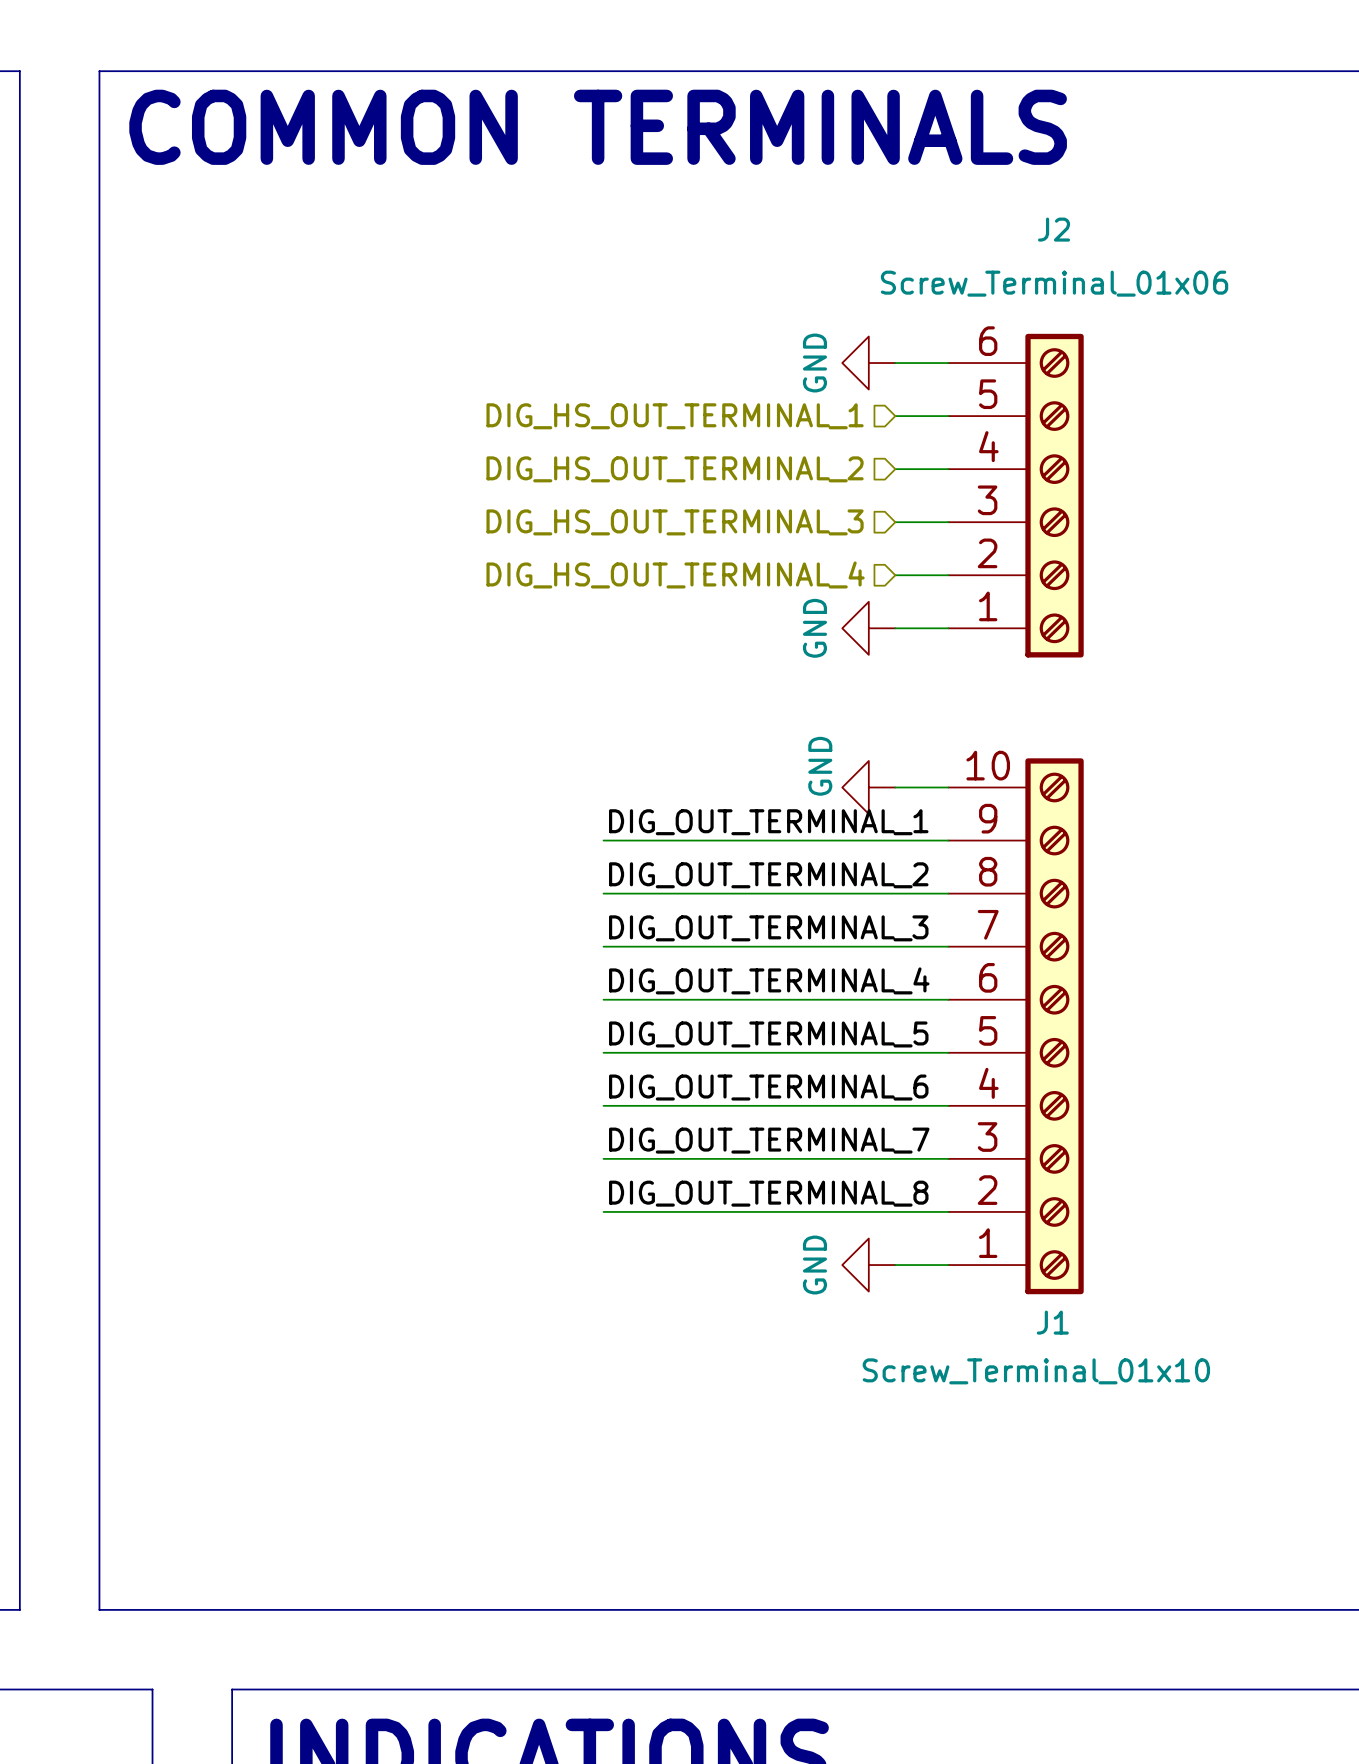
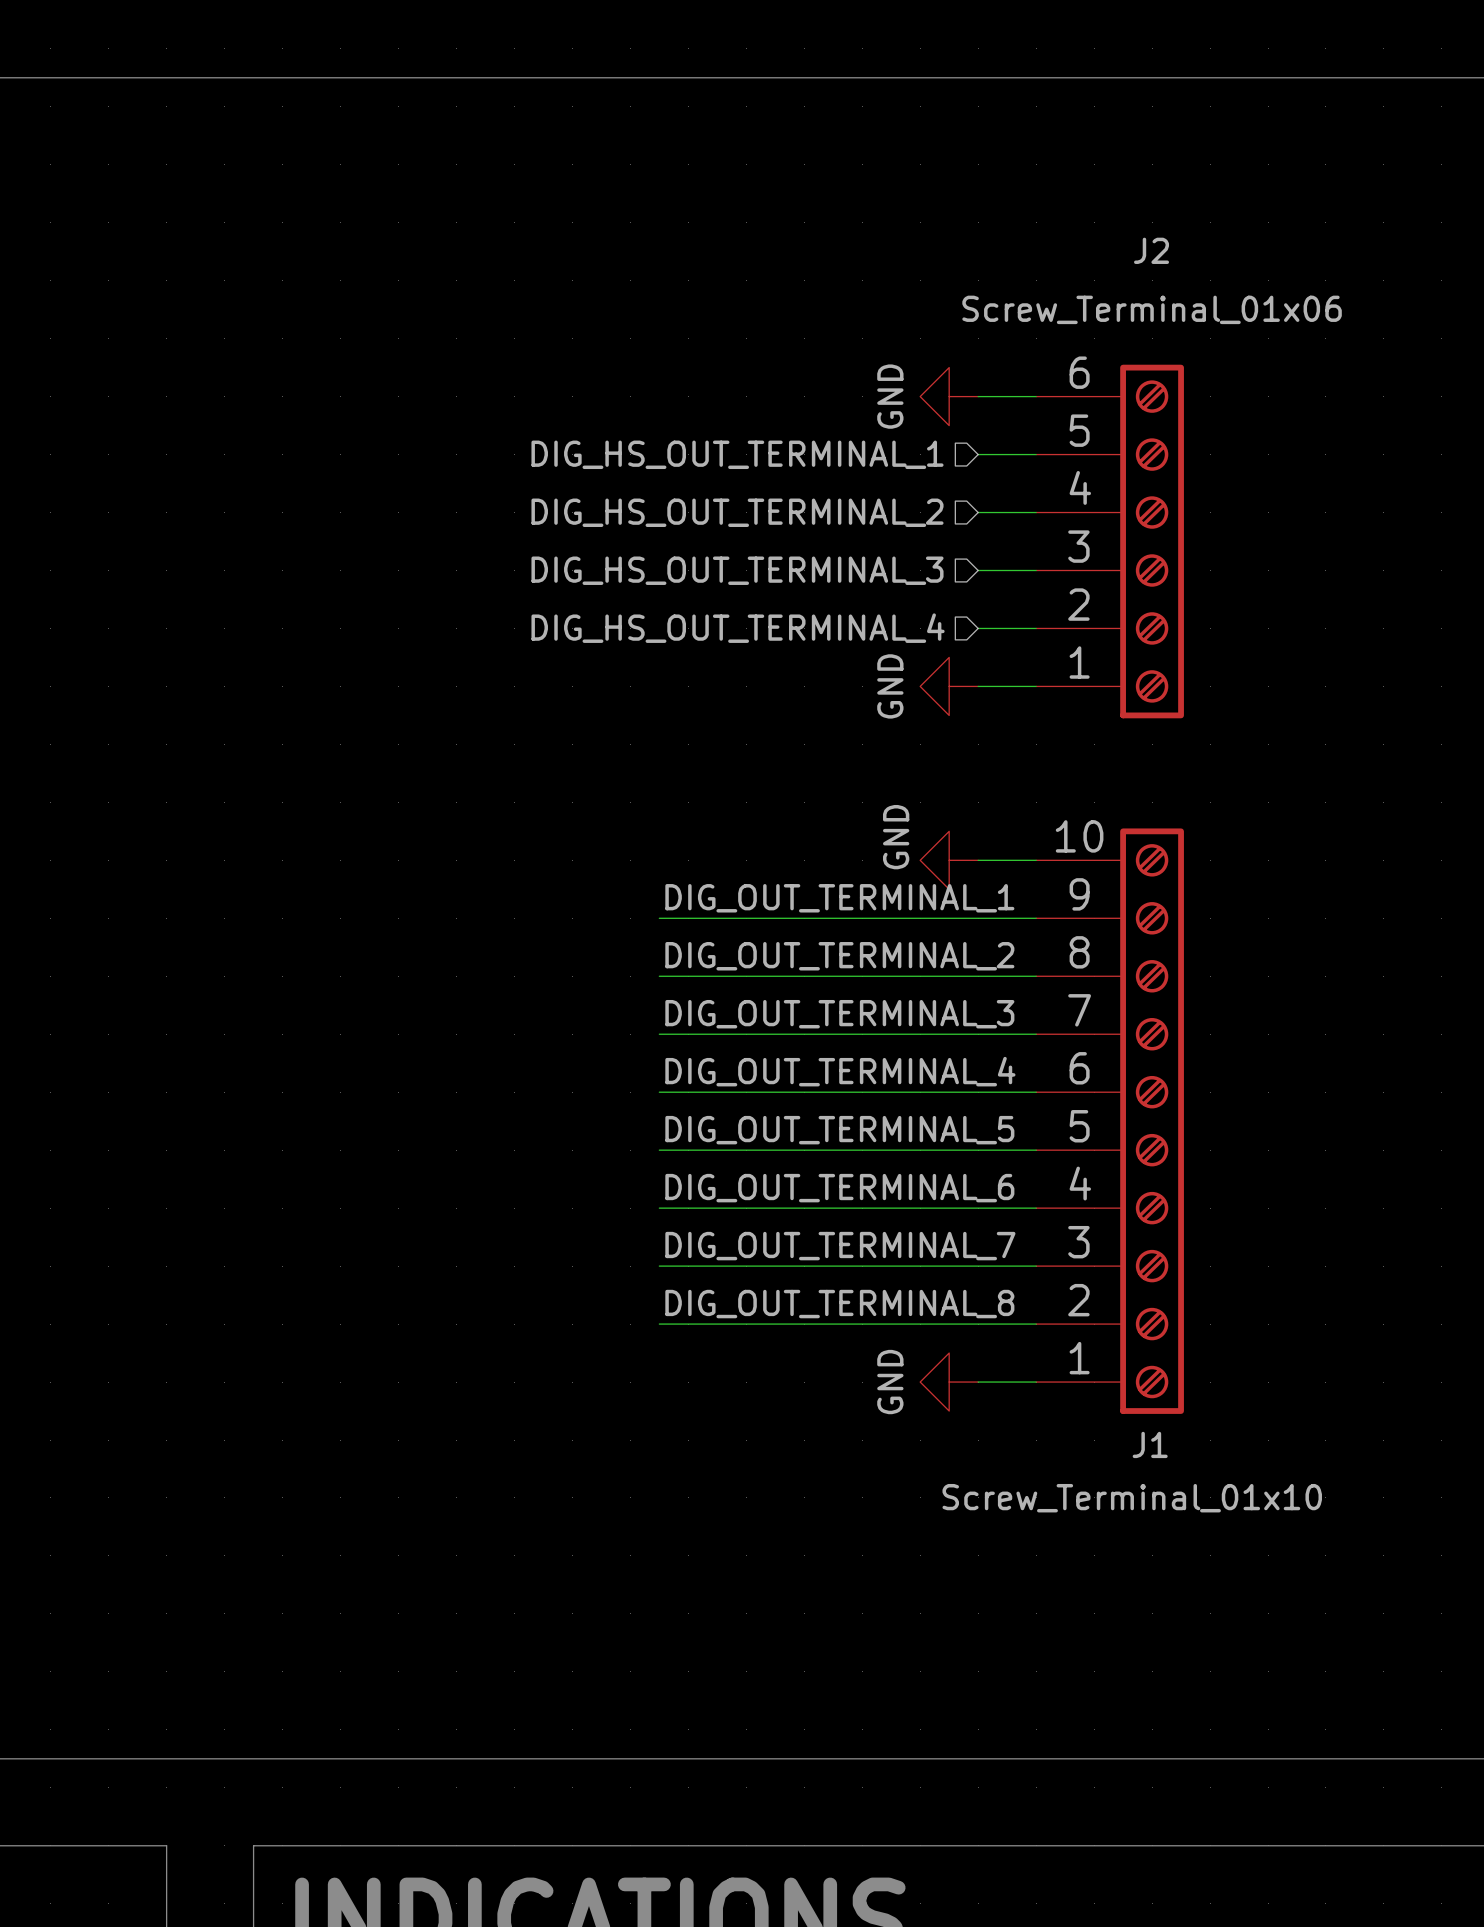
line: (19, 71) (19, 1609) -> (21, 77) (108, 77)
line: (99, 71) (99, 1609) -> (21, 1758) (108, 1758)
text: COMMON TERMINALS (598, 127) -> none

